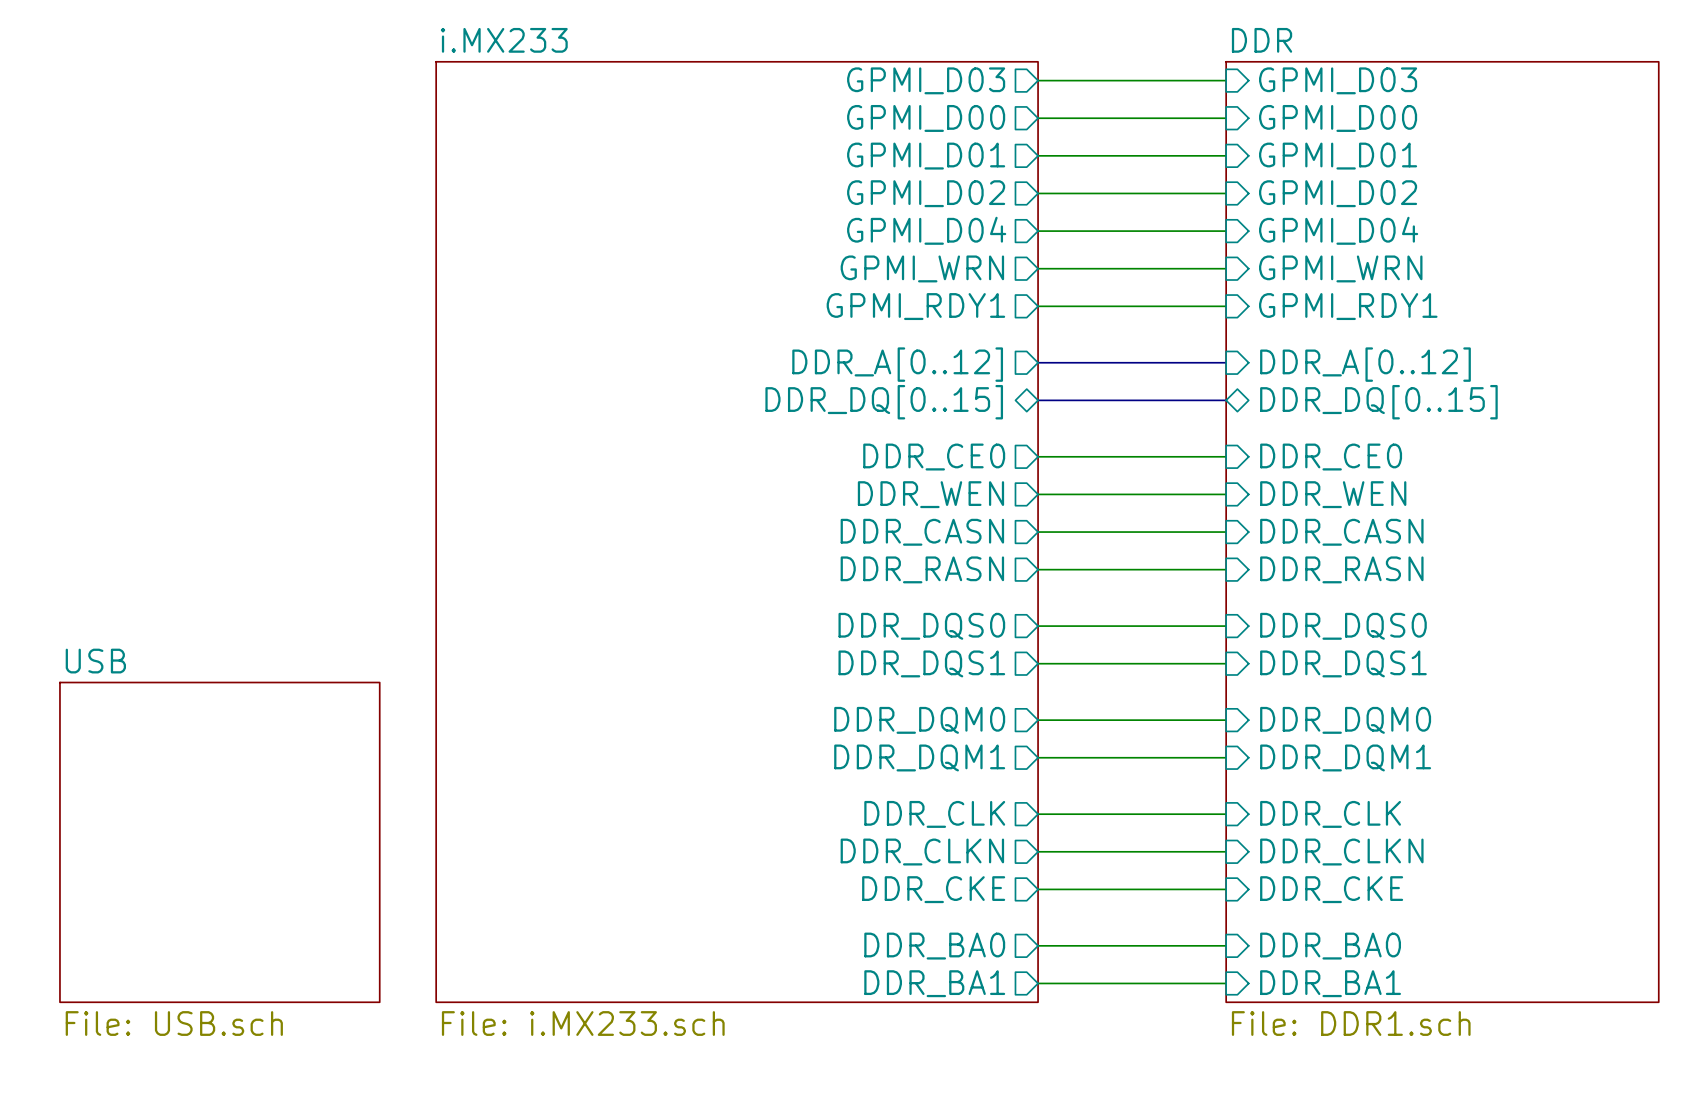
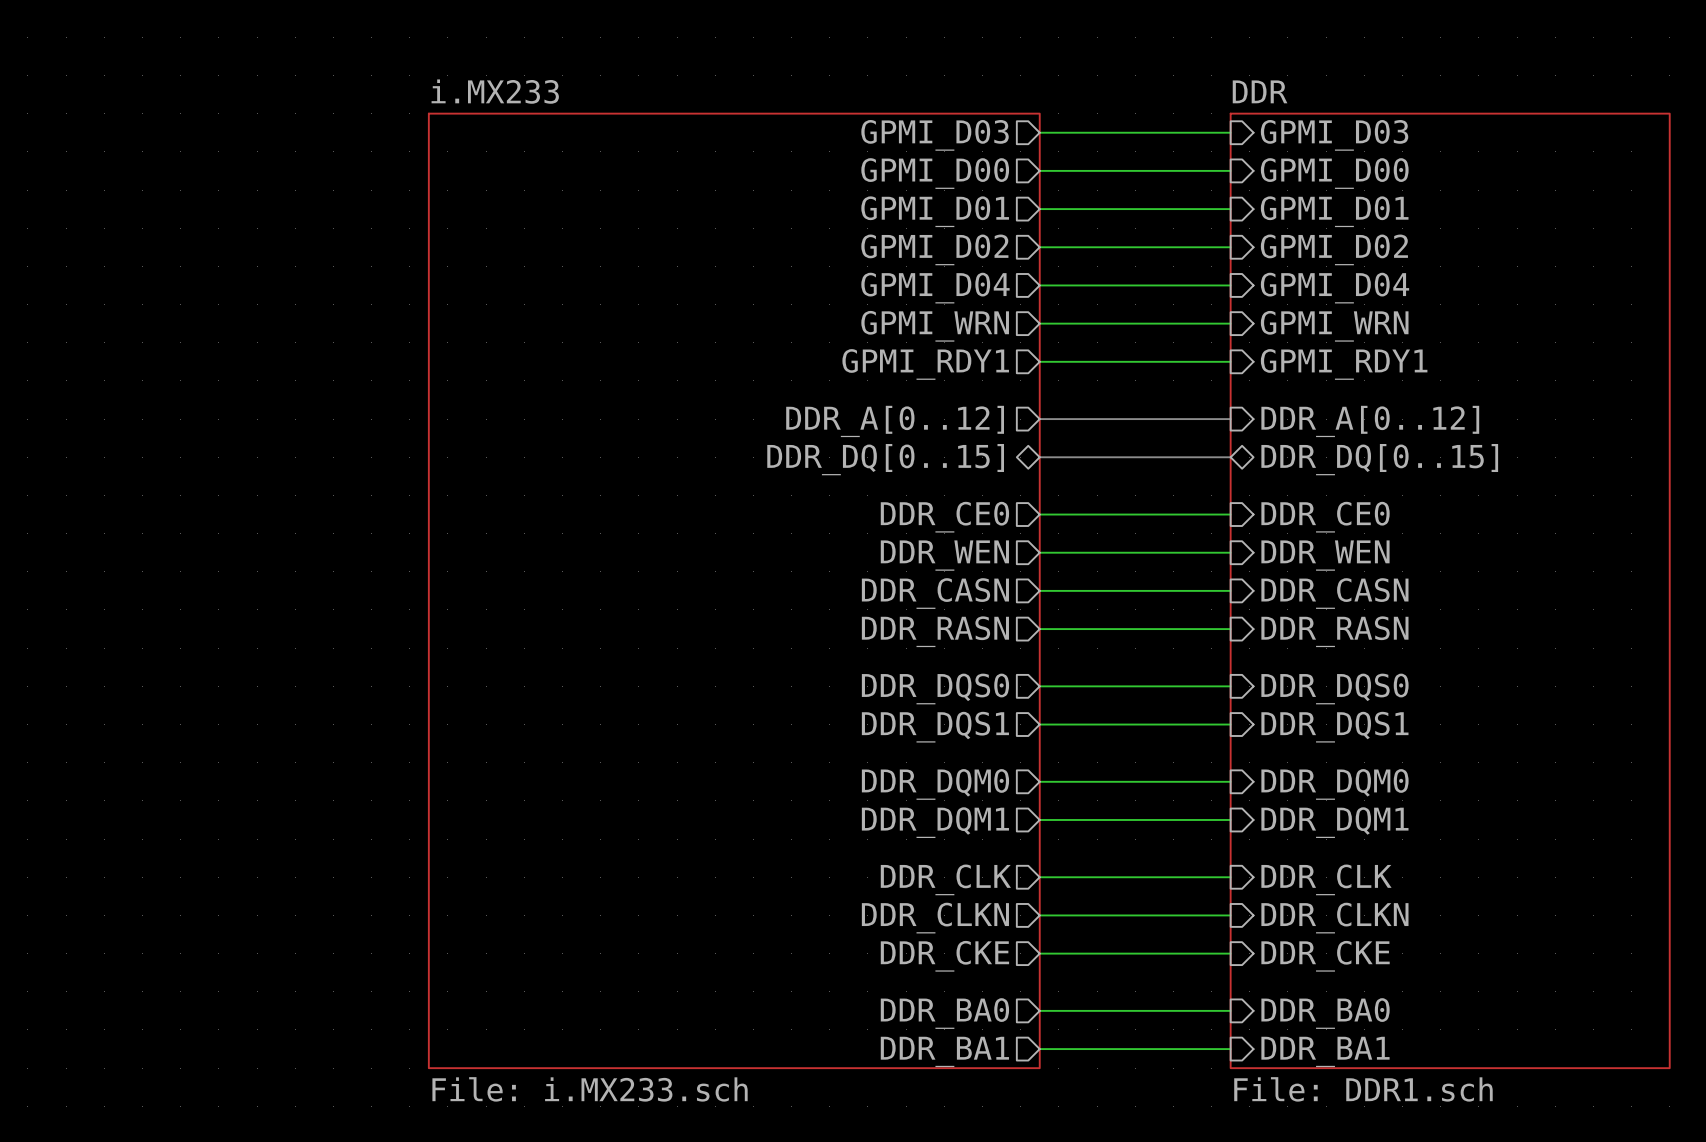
sheet USB: File: USB.sch (219, 842) -> none

